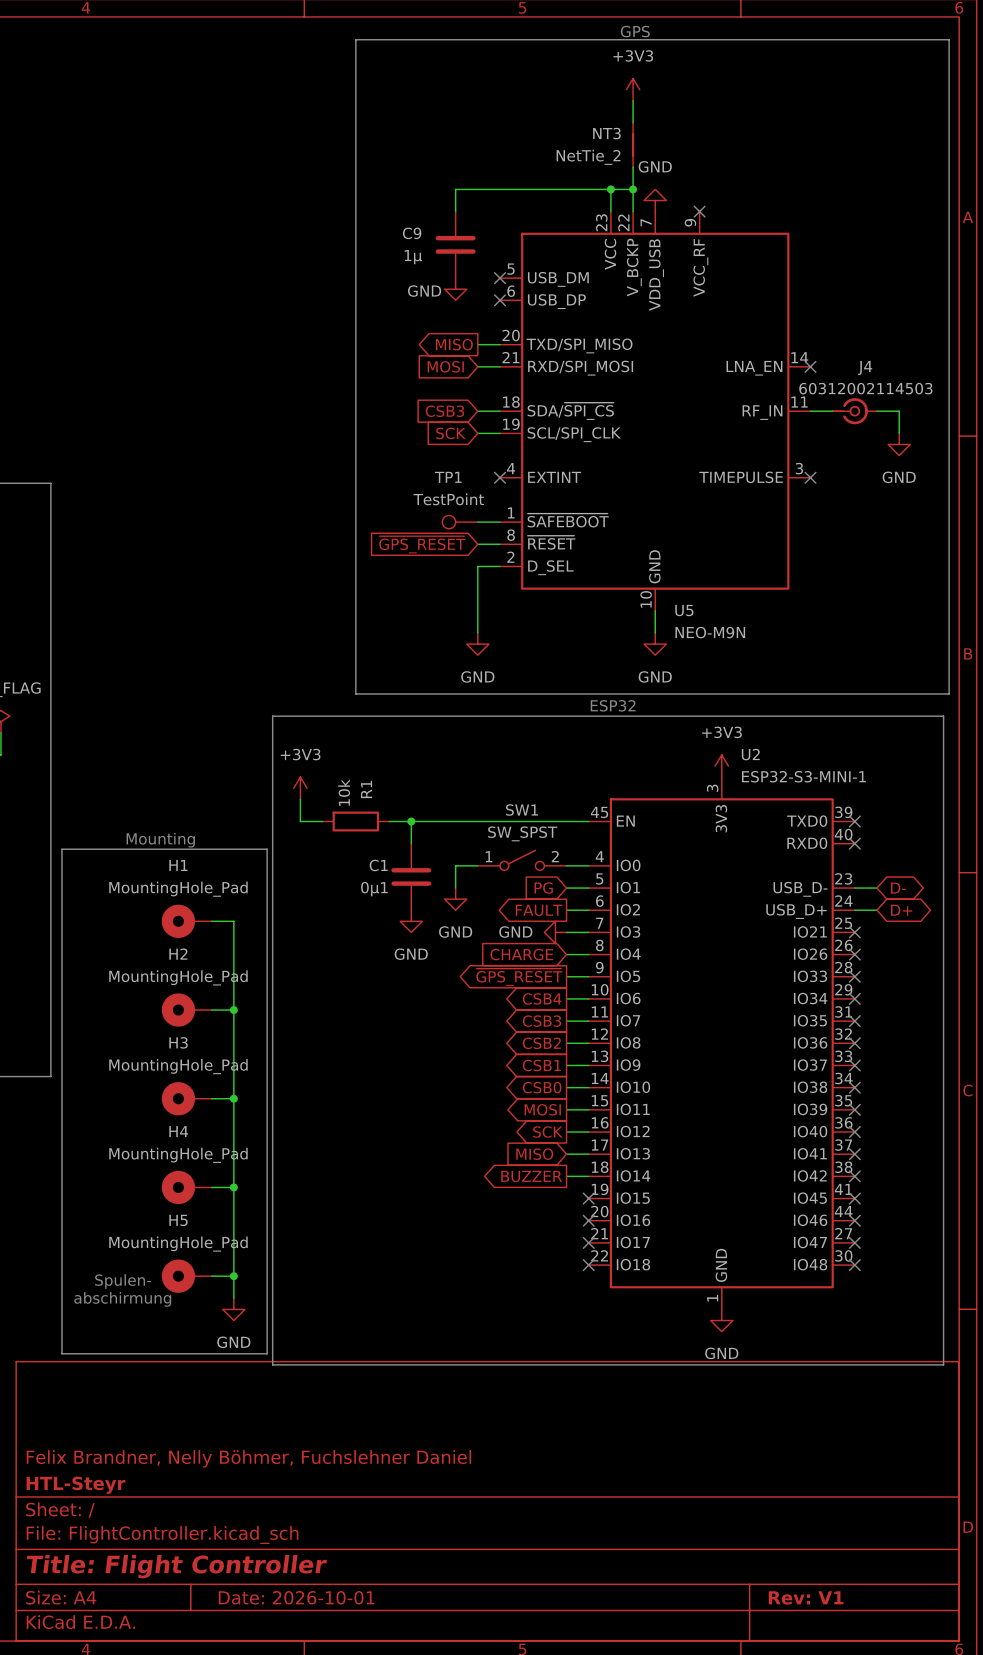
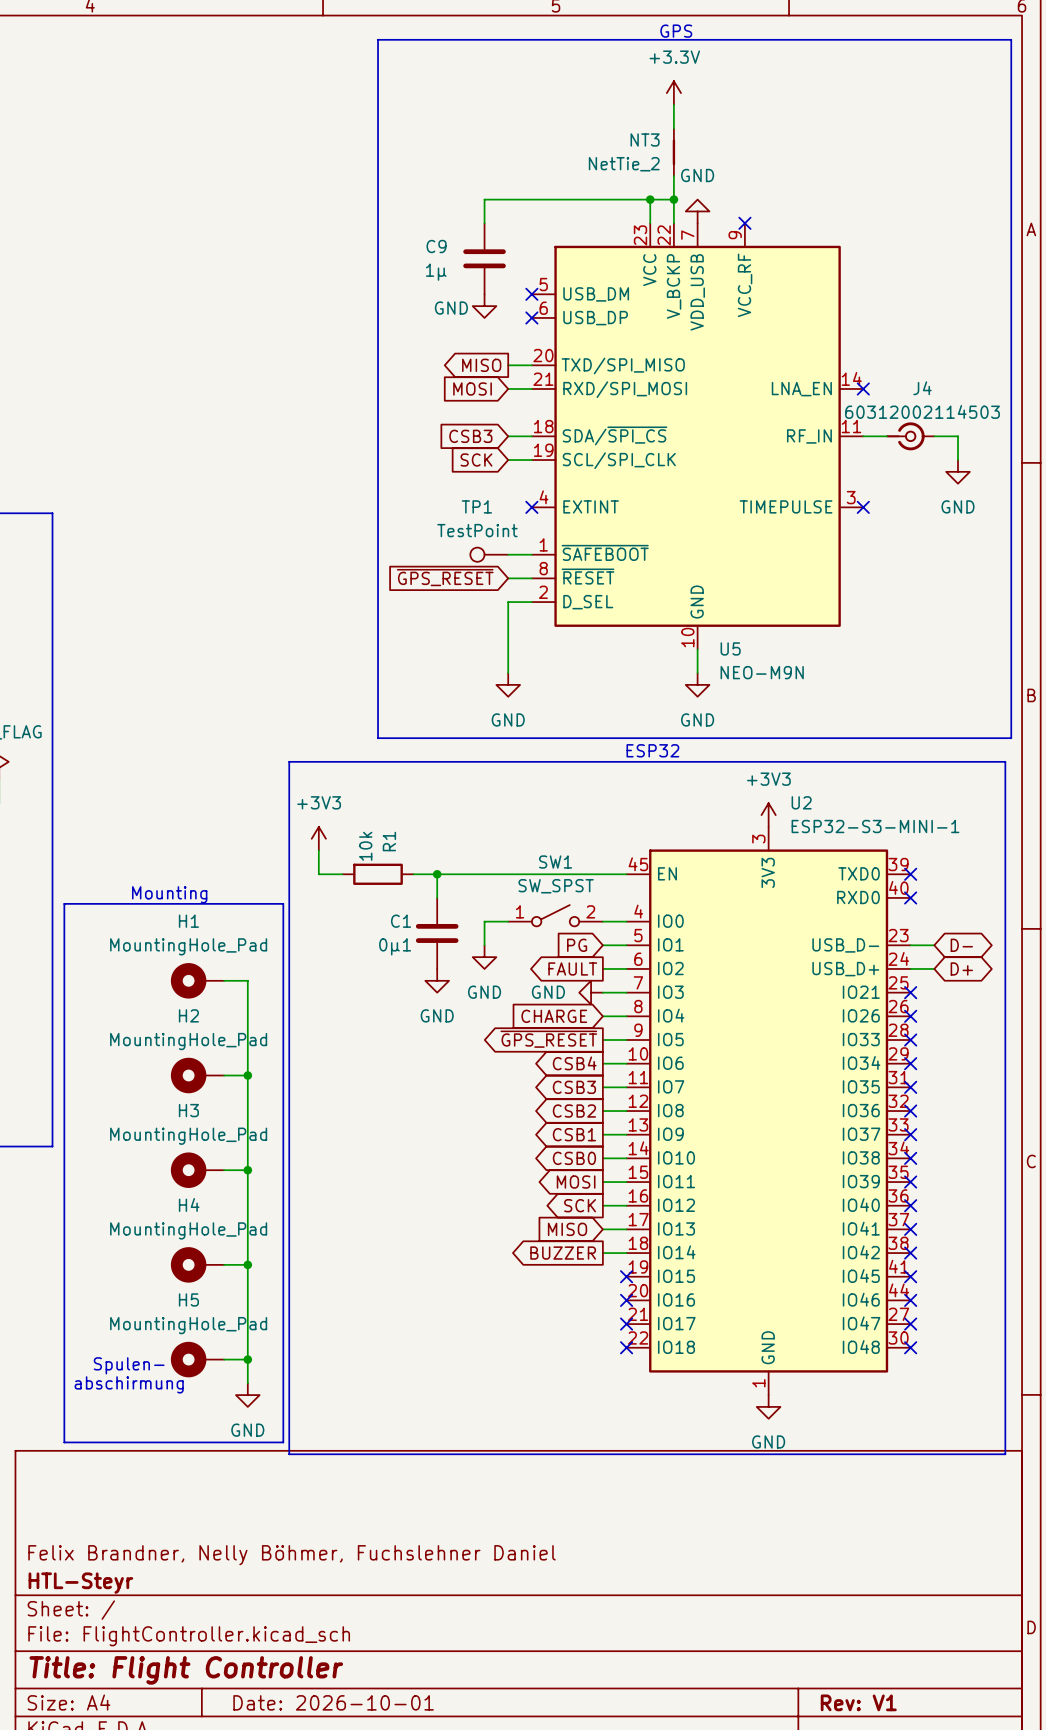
power symbol: +3V3 (633, 89) -> +3.3V (673, 93)

